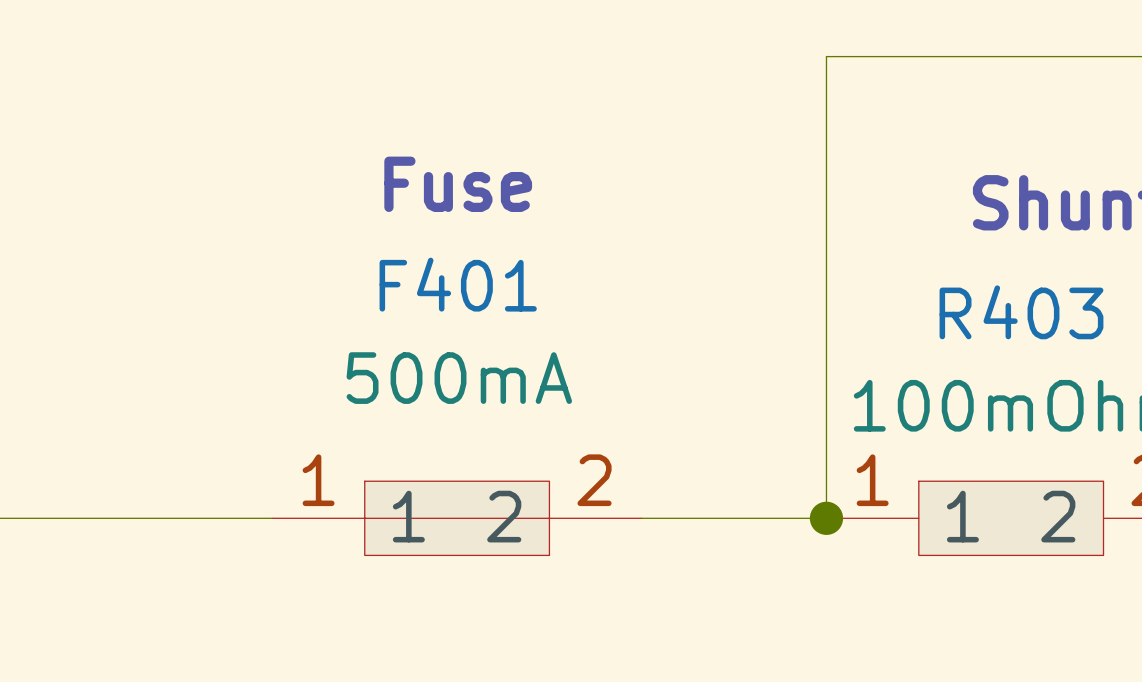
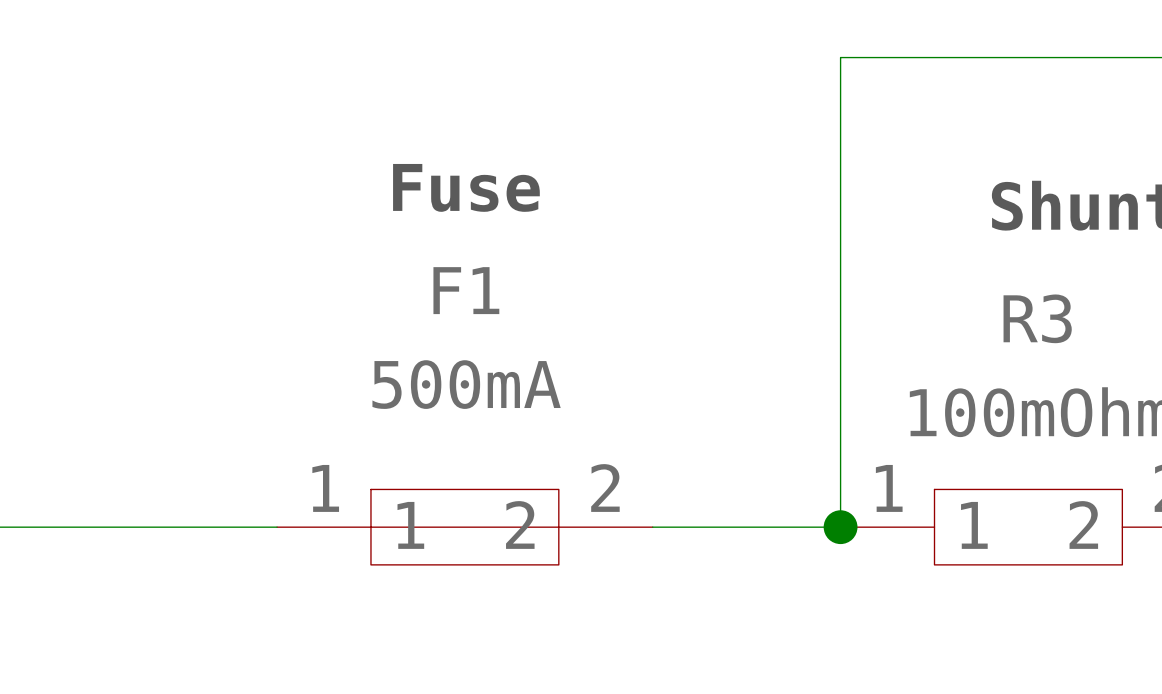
F401 name: F401 (458, 284) -> F1 (466, 290)
R403 name: R403 (1021, 312) -> R3 (1037, 318)

